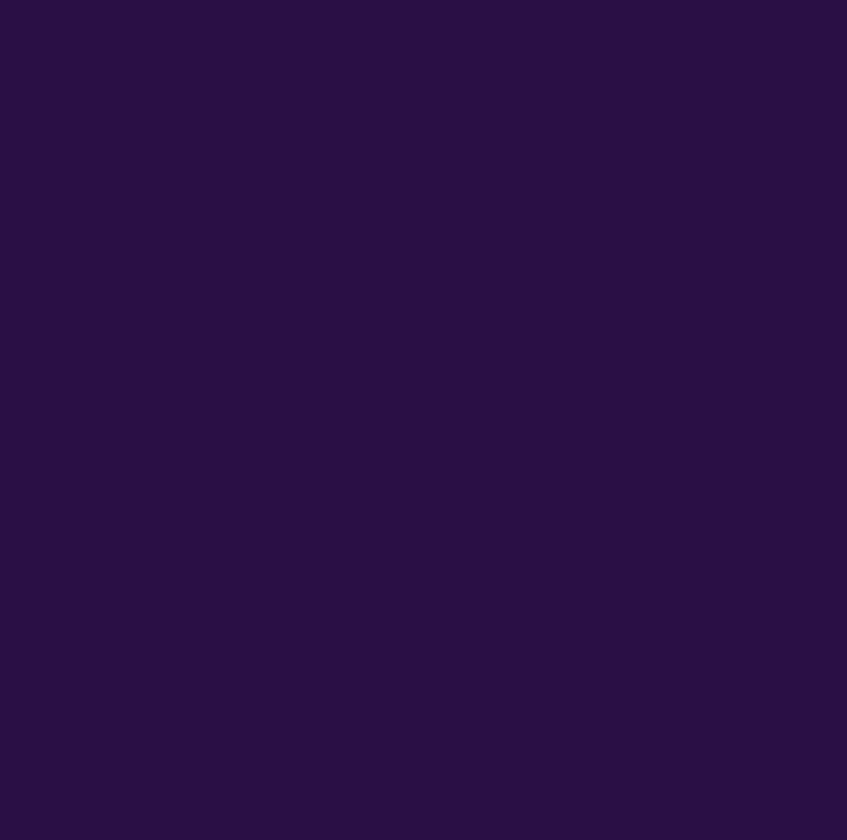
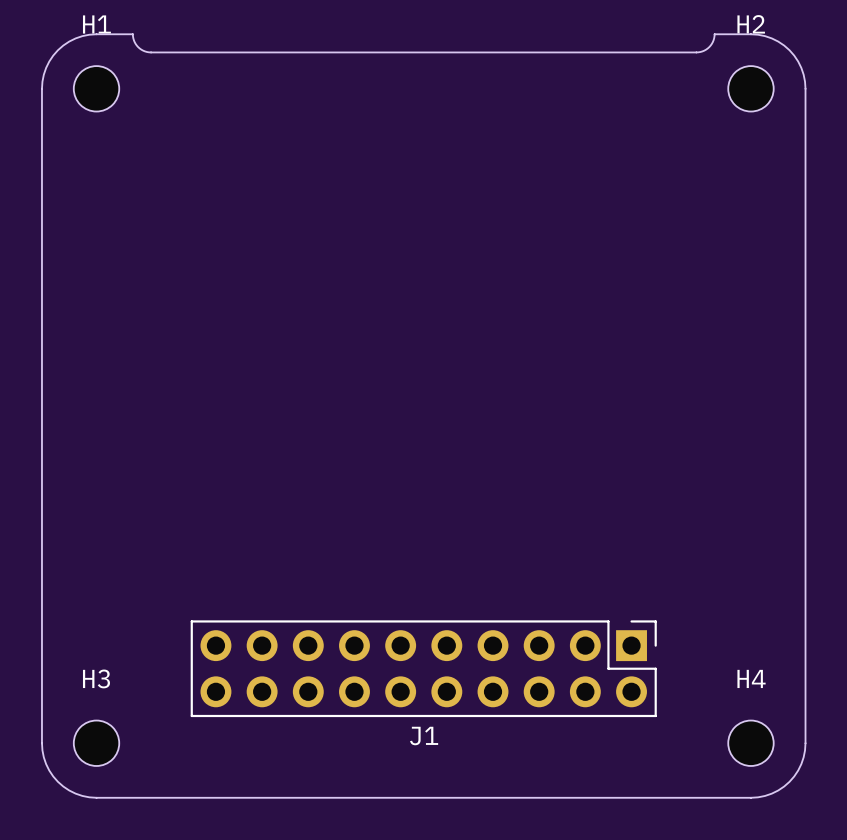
board edge: none -> (96, 34) (132, 34) (138, 47) (151, 52) (696, 52) (709, 47) (714, 34) (765, 36) (778, 41) (789, 50) (801, 67) (805, 88) (805, 743) (801, 764) (789, 781) (771, 793) (750, 797) (96, 797) (75, 793) (57, 781) (46, 764) (41, 743) (41, 88) (46, 67) (57, 50) (75, 38) (96, 34)
H1: none -> (96, 88)
H2: none -> (750, 88)
J1: none -> (423, 668)
H3: none -> (96, 743)
H4: none -> (750, 743)

